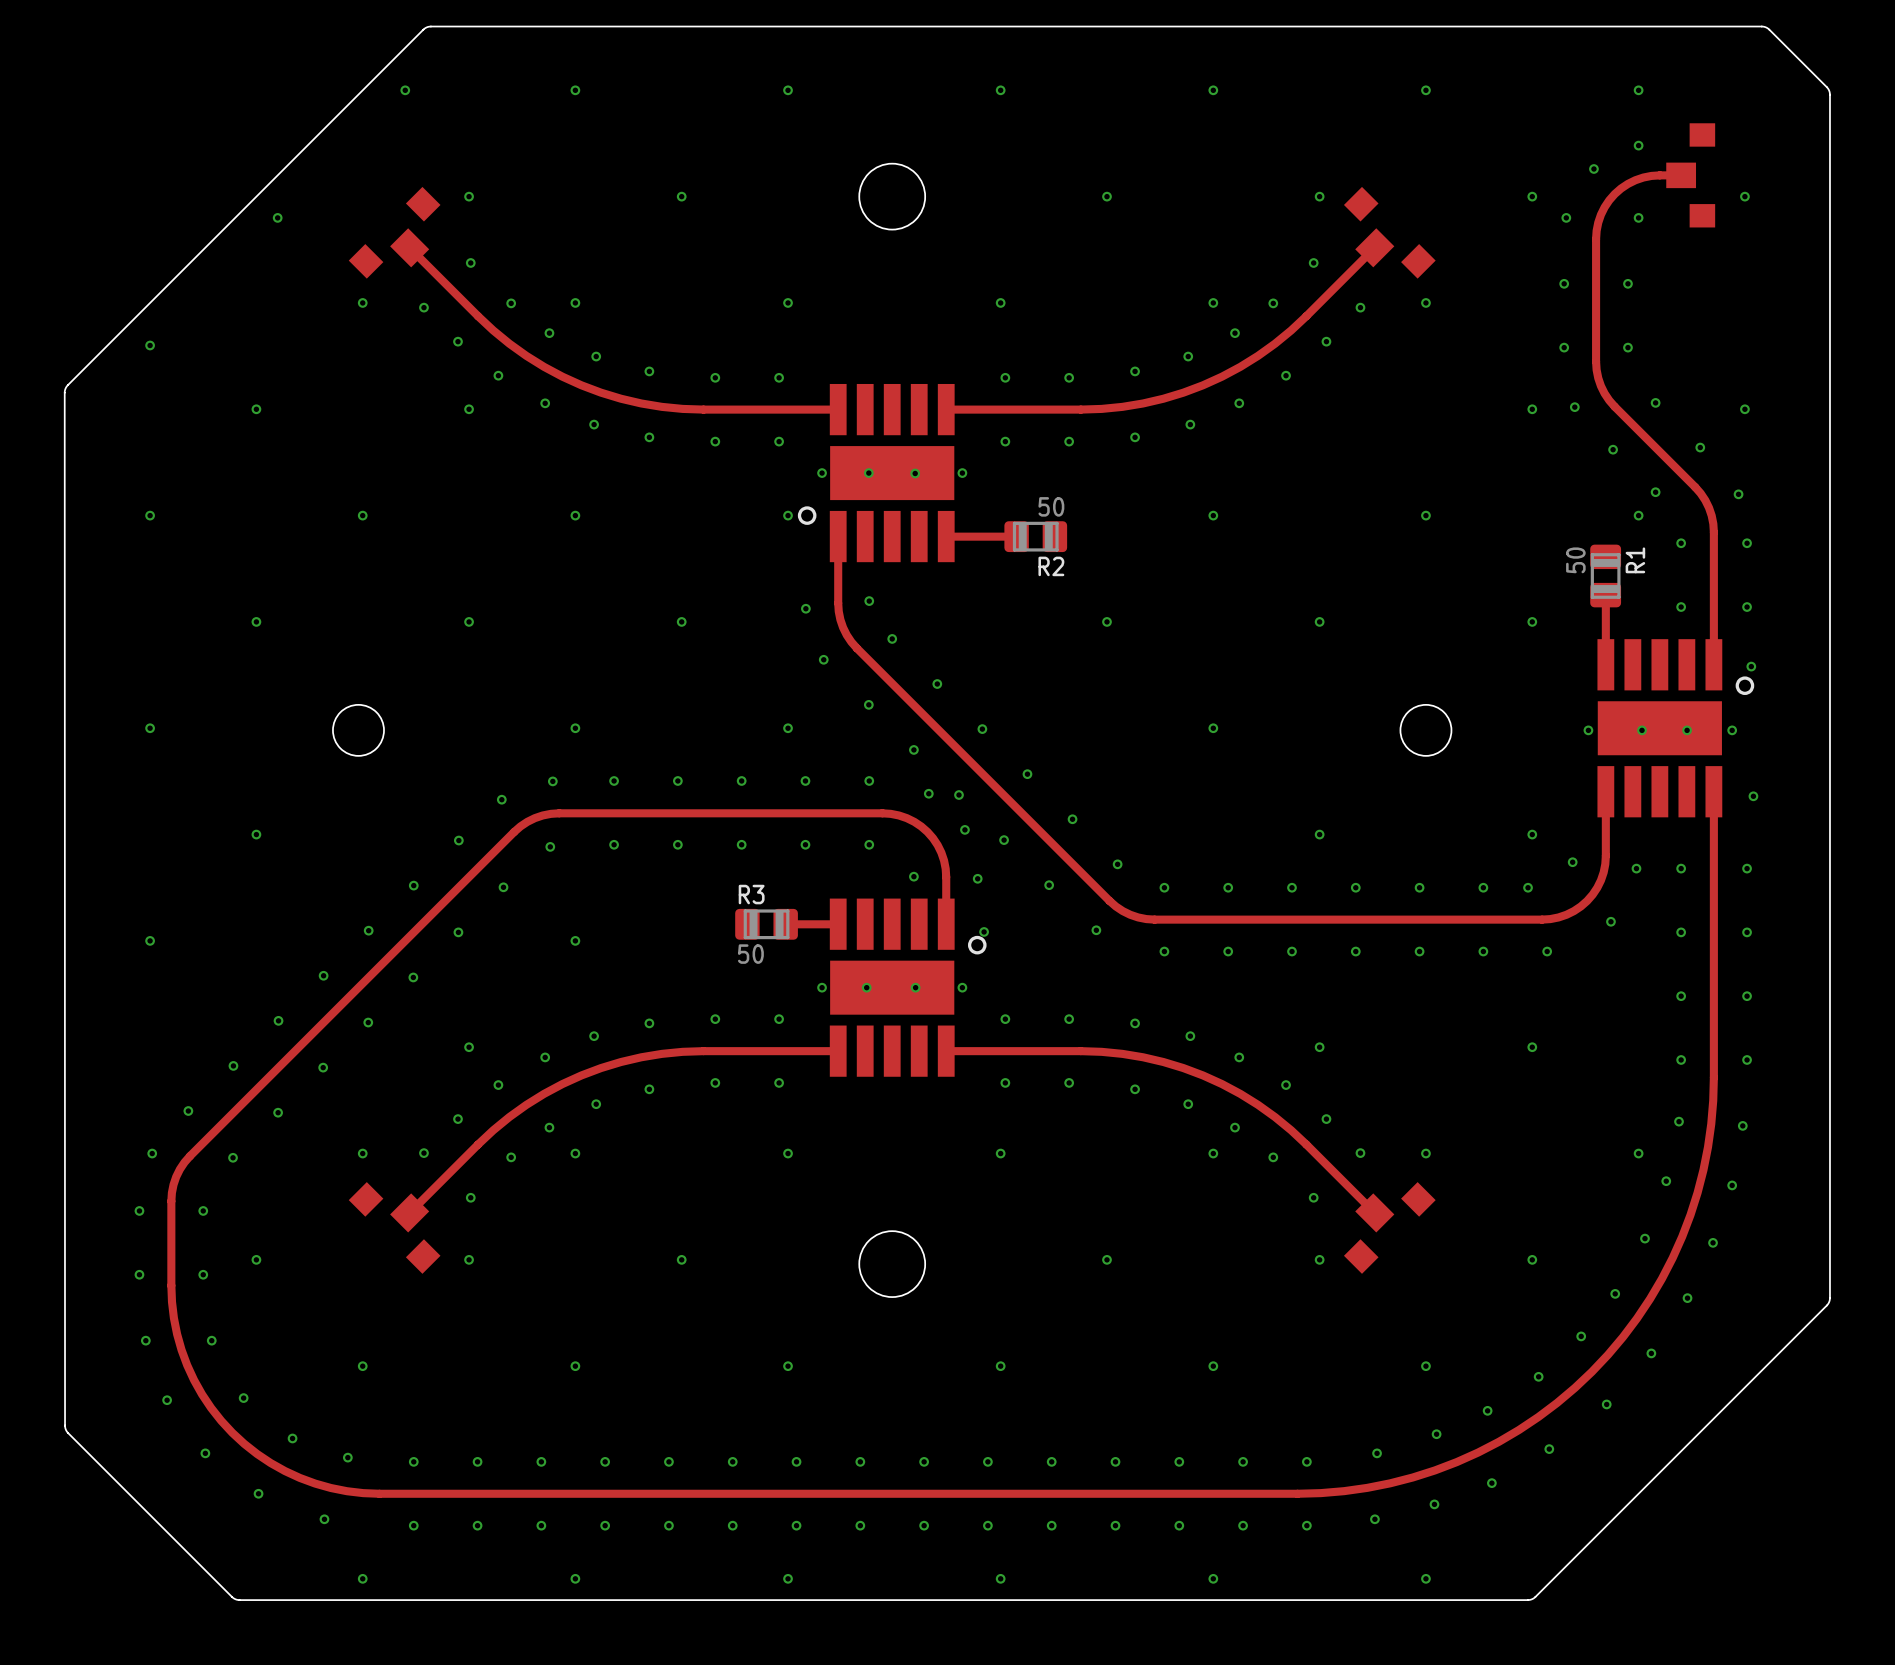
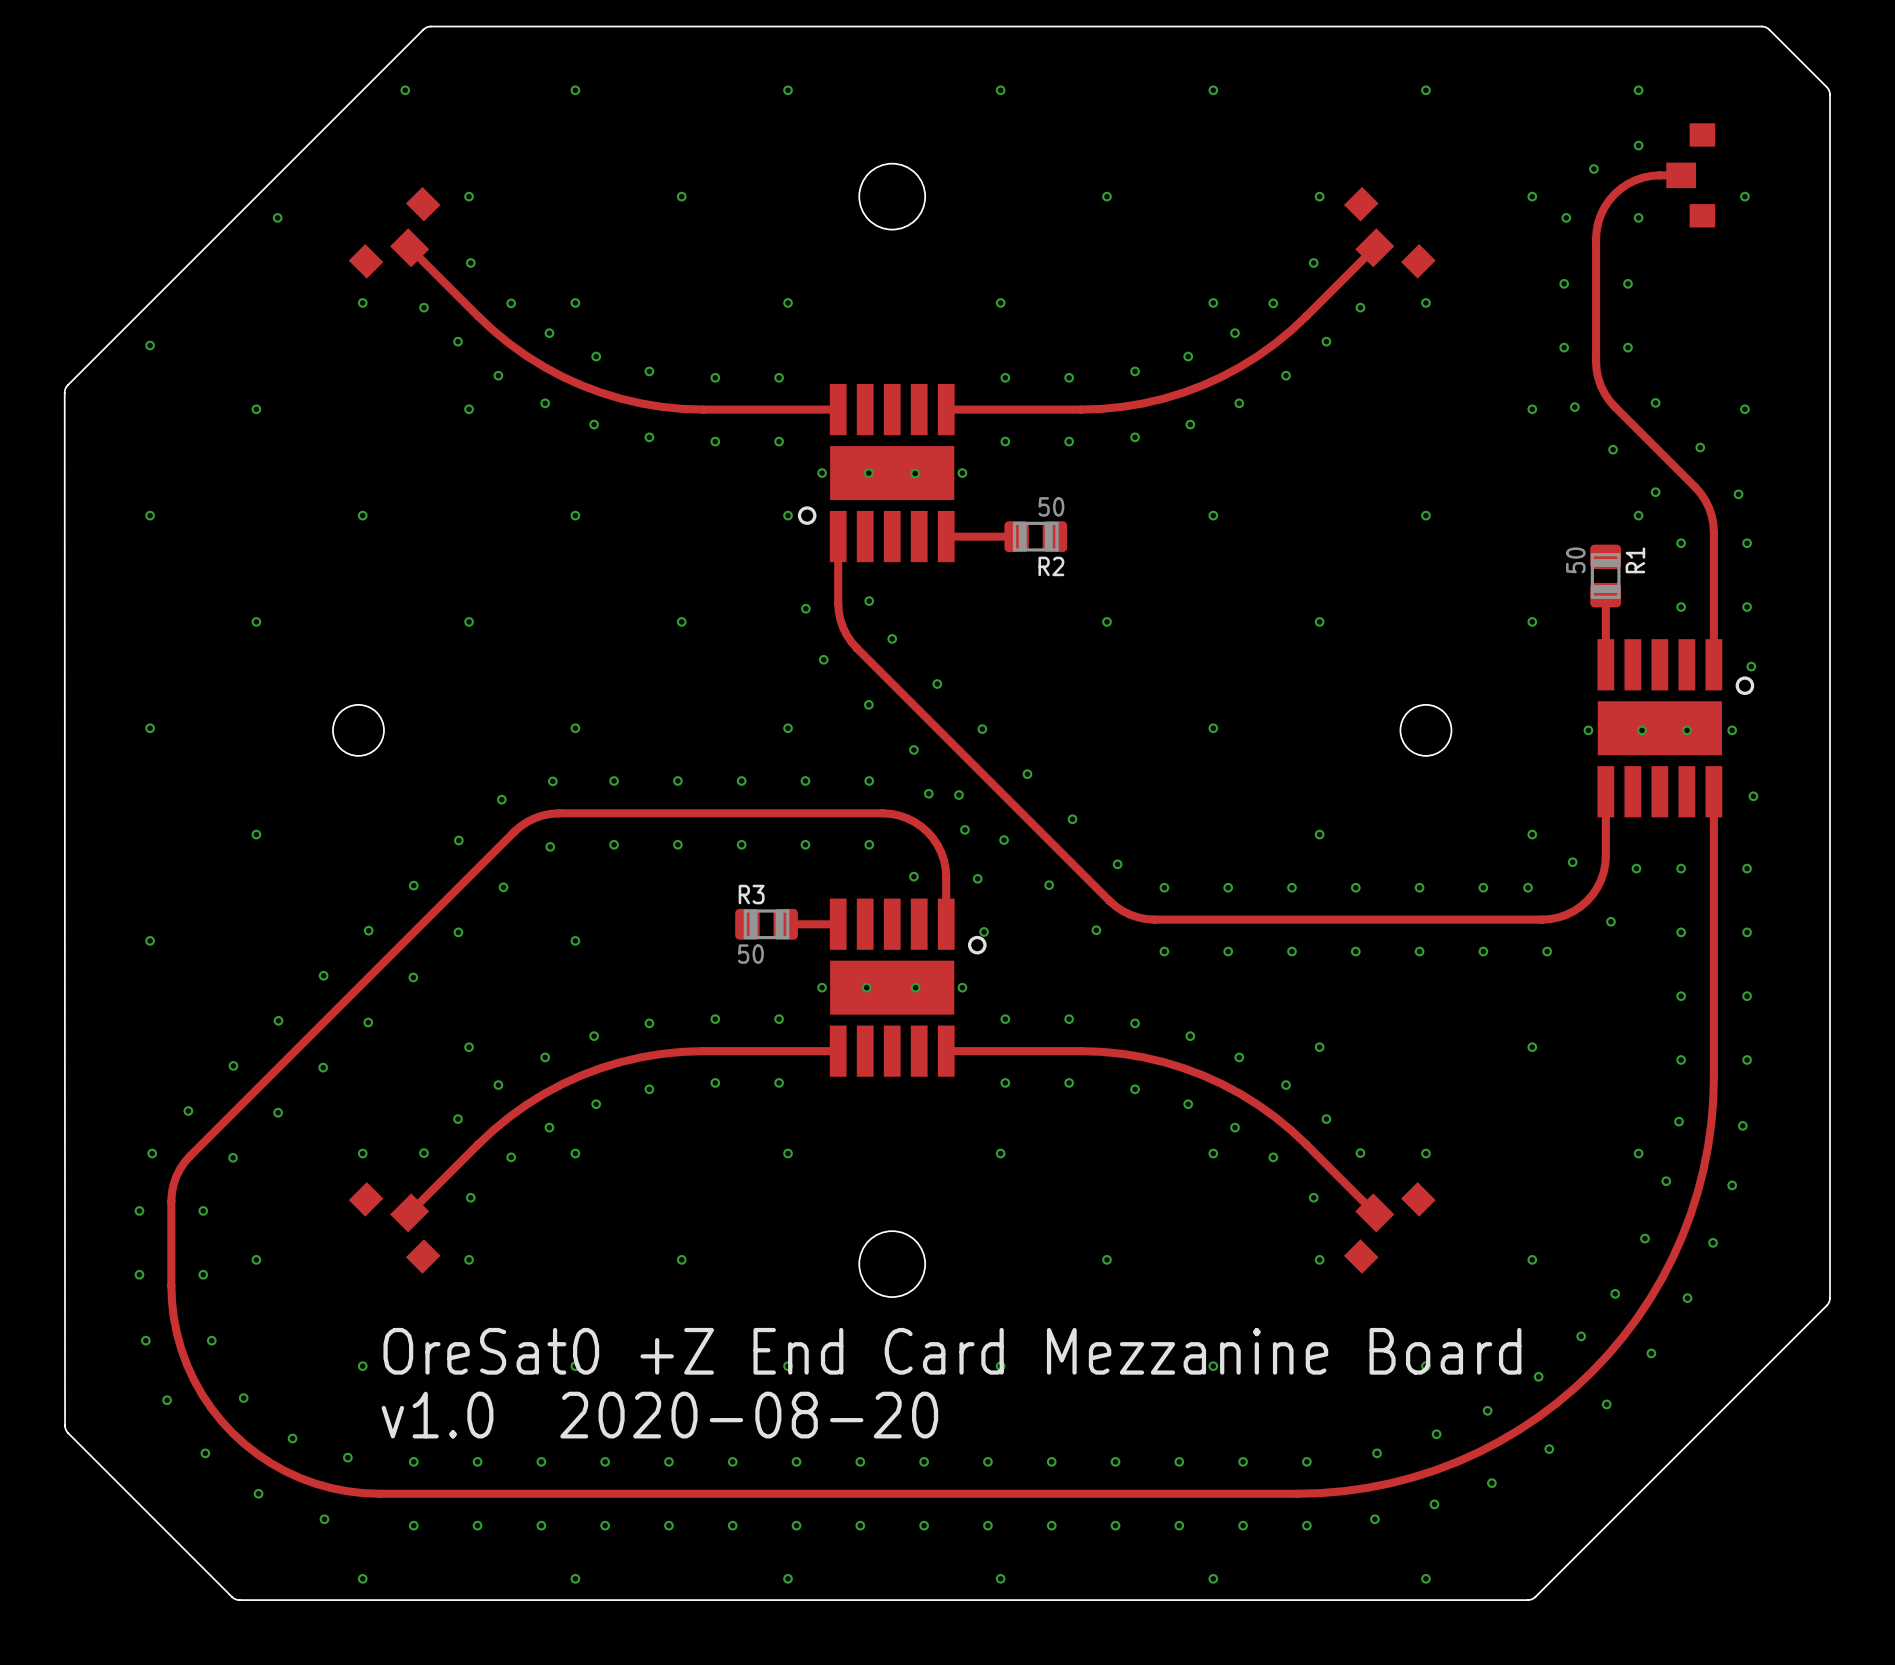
text: none -> OreSat0 +Z End Card Mezzanine Board (952, 1351)
text: none -> v1.0 2020-08-20 (659, 1415)

